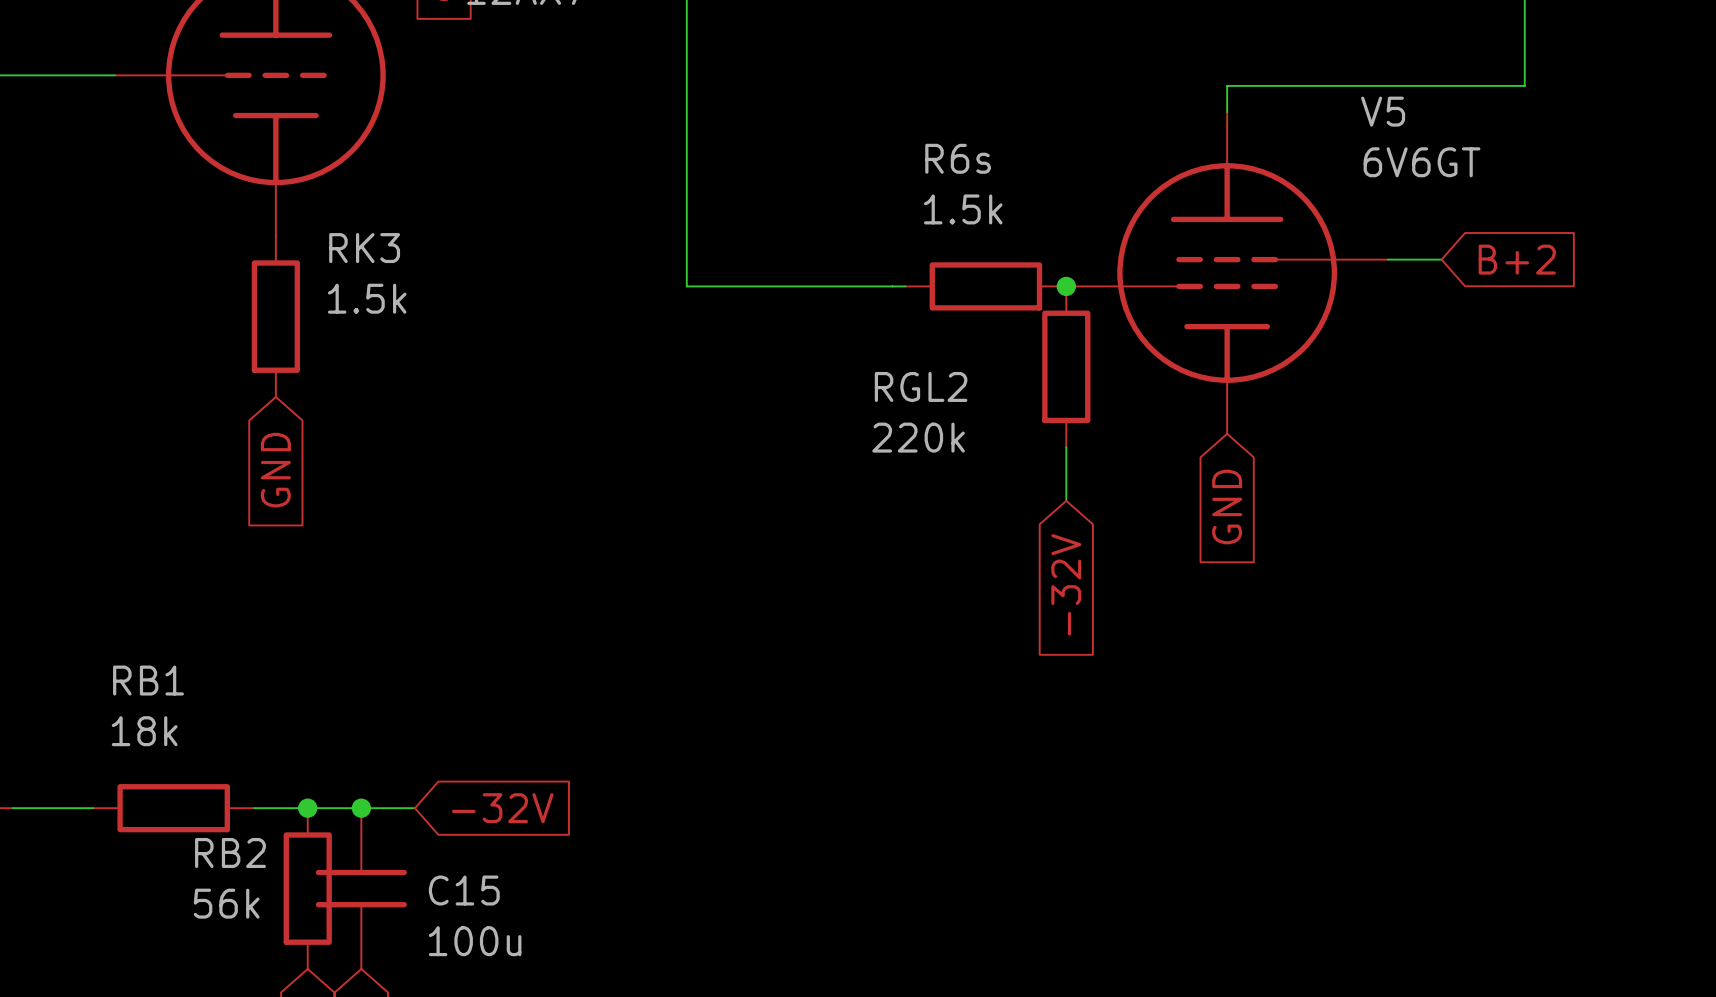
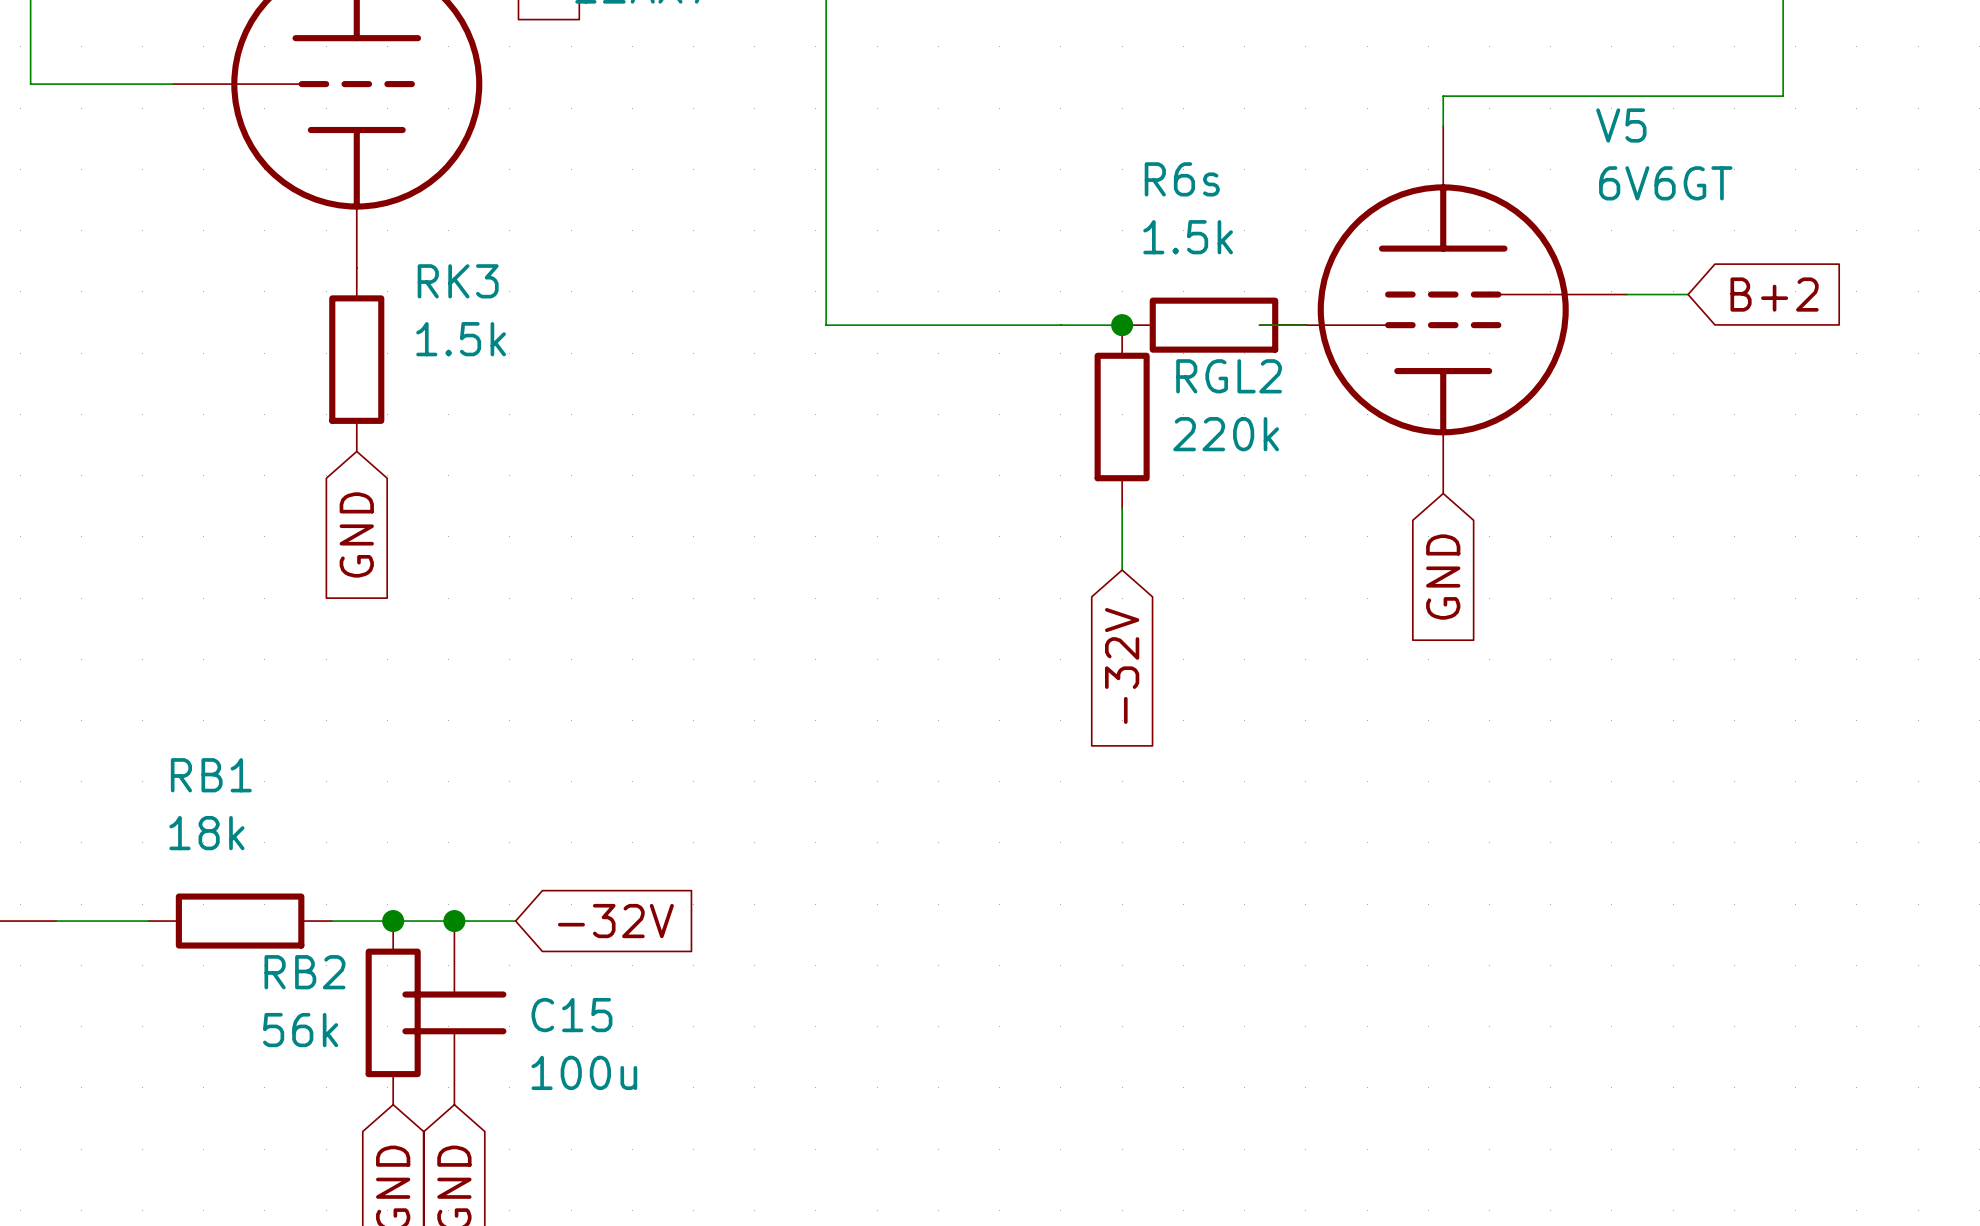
R6s position: (985, 286) -> (1213, 325)
junction position: (1066, 286) -> (1122, 325)
RGL2 position: (1066, 366) -> (1122, 416)
RGL2 name position: RGL2 (921, 386) -> RGL2 (1229, 376)
RGL2 value position: 220k (918, 437) -> 220k (1226, 434)
wire: (1066, 447) (1066, 500) -> (1122, 508) (1122, 570)
global label position: -32V (1066, 584) -> -32V (1122, 665)

